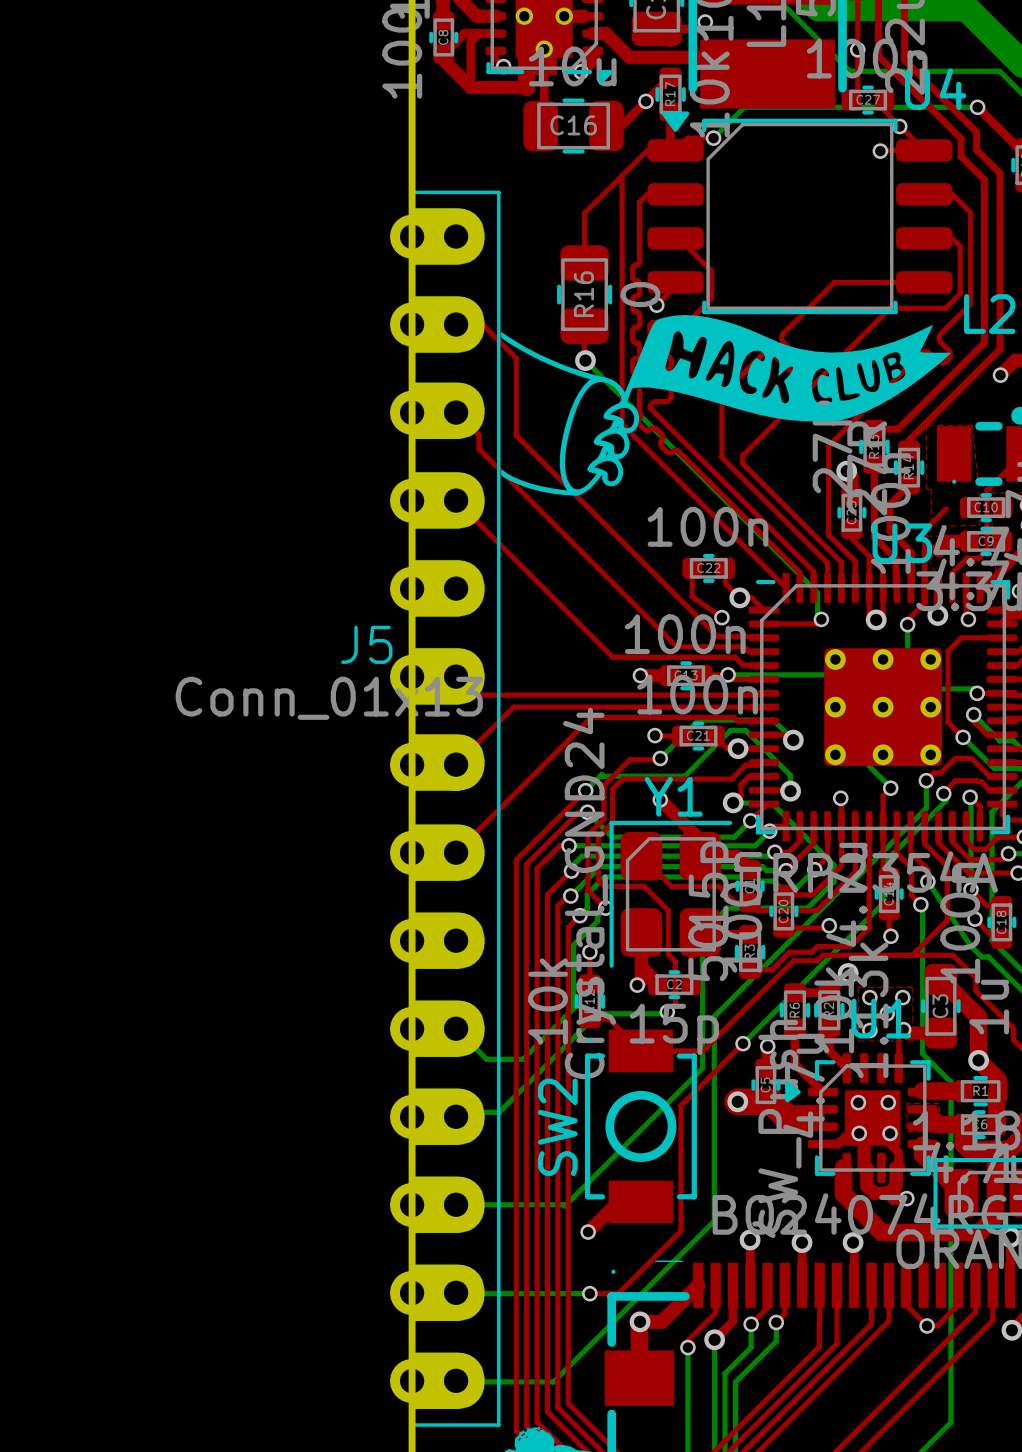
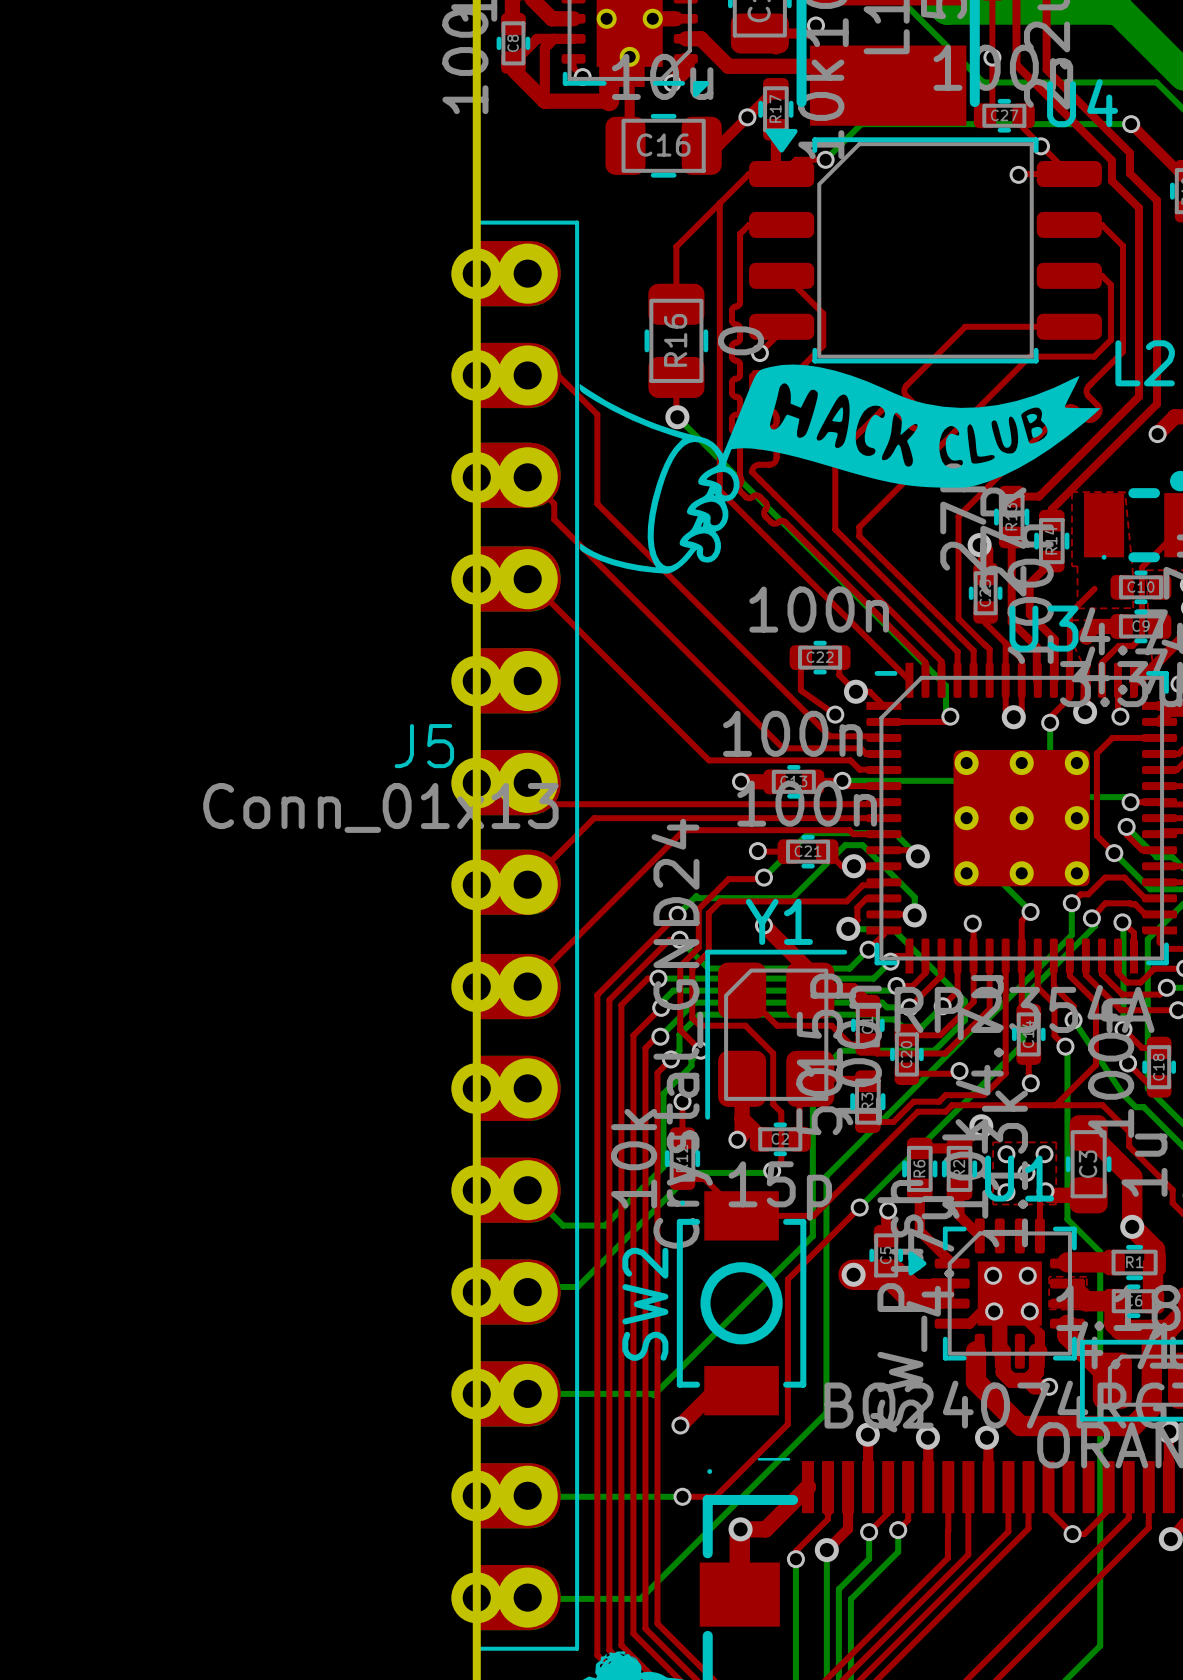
J5 footprint: [390, 190, 501, 1427] -> [451, 220, 580, 1651]

